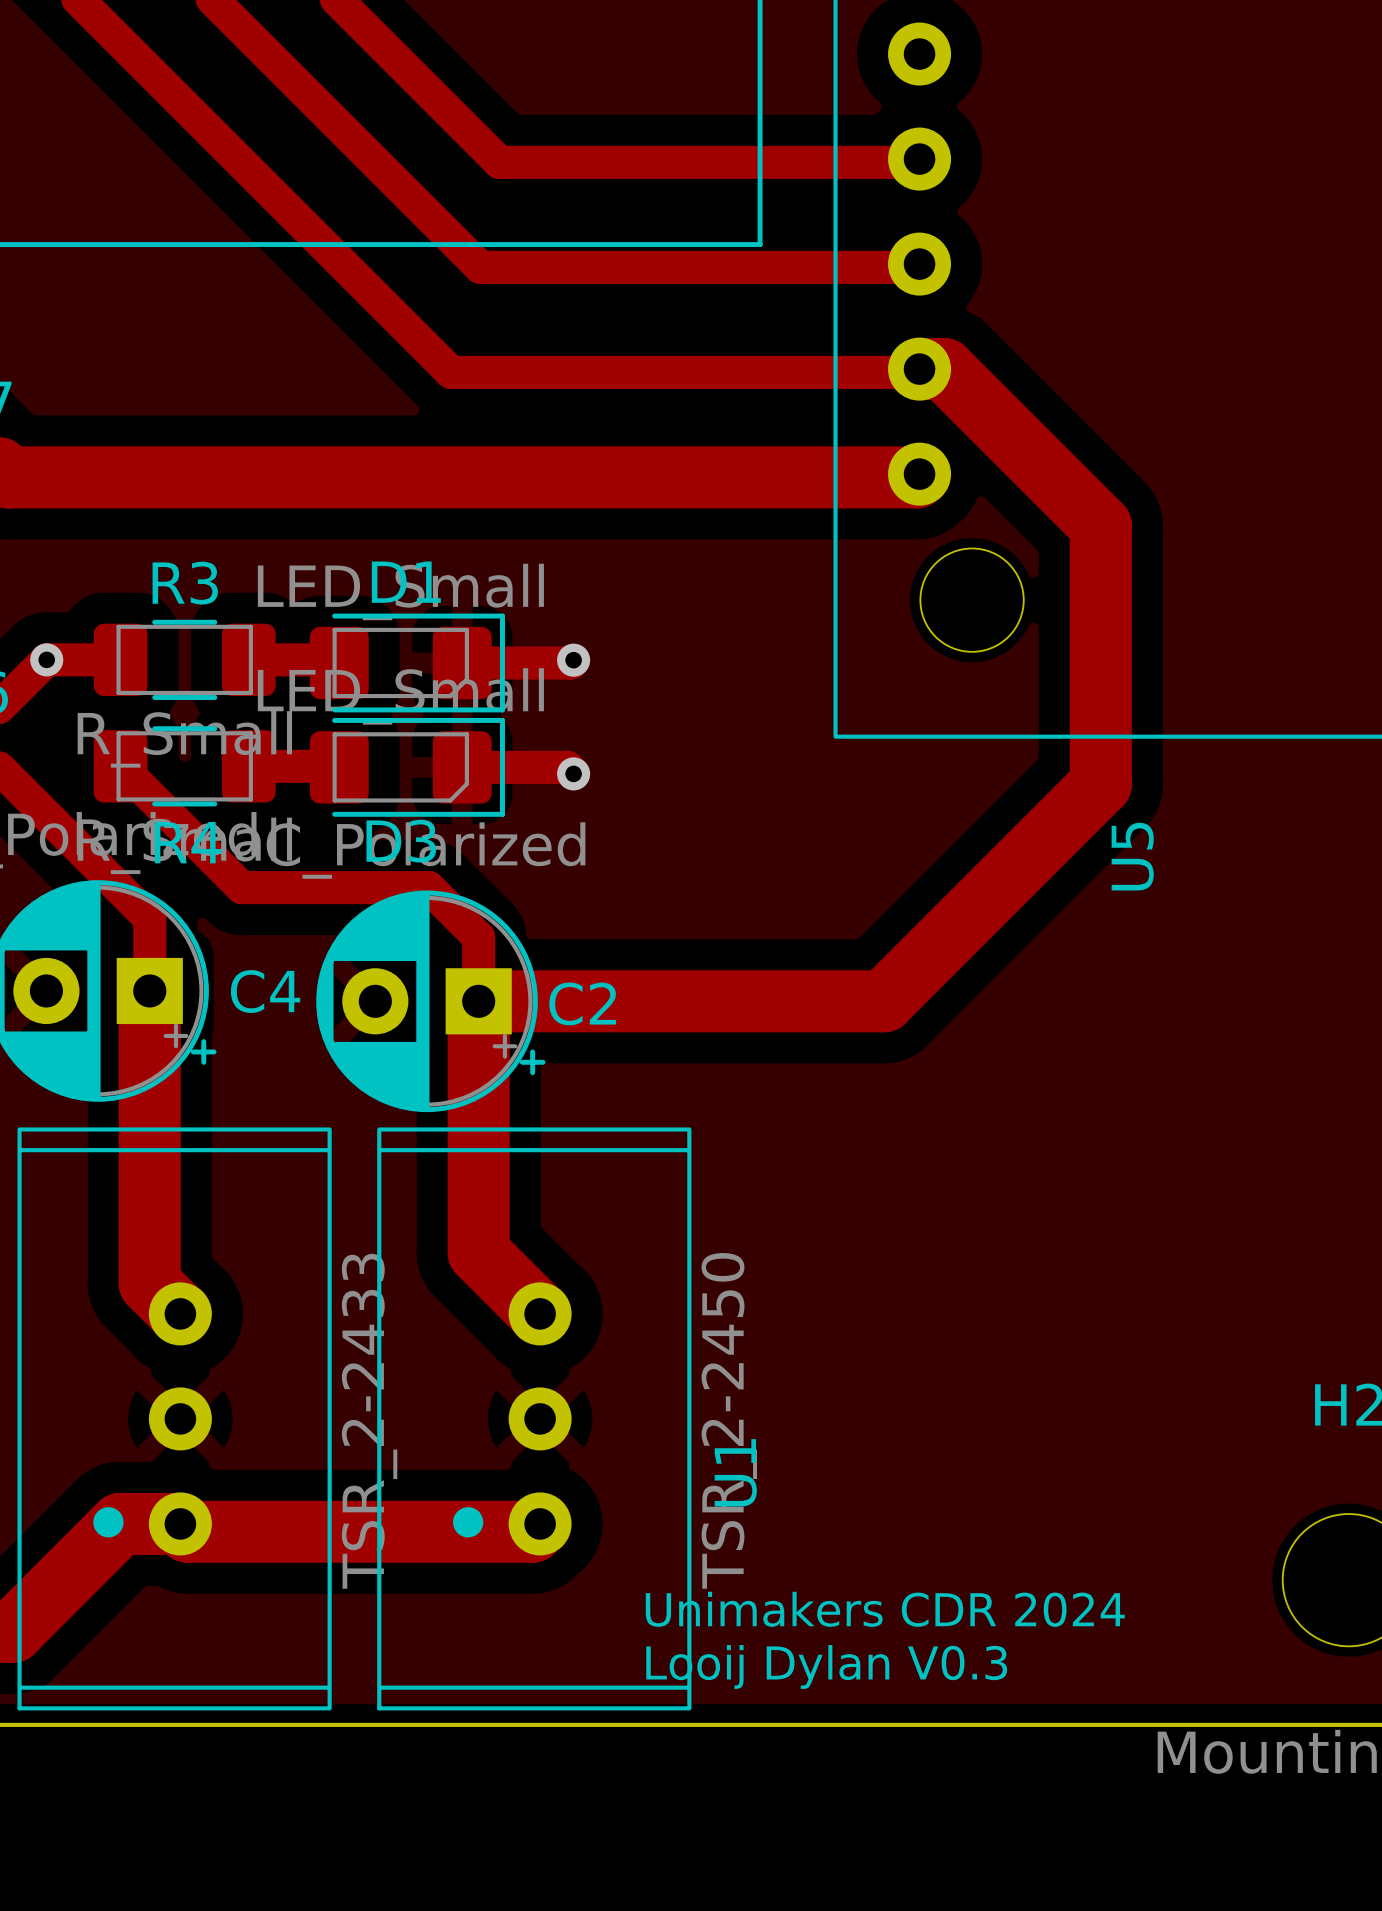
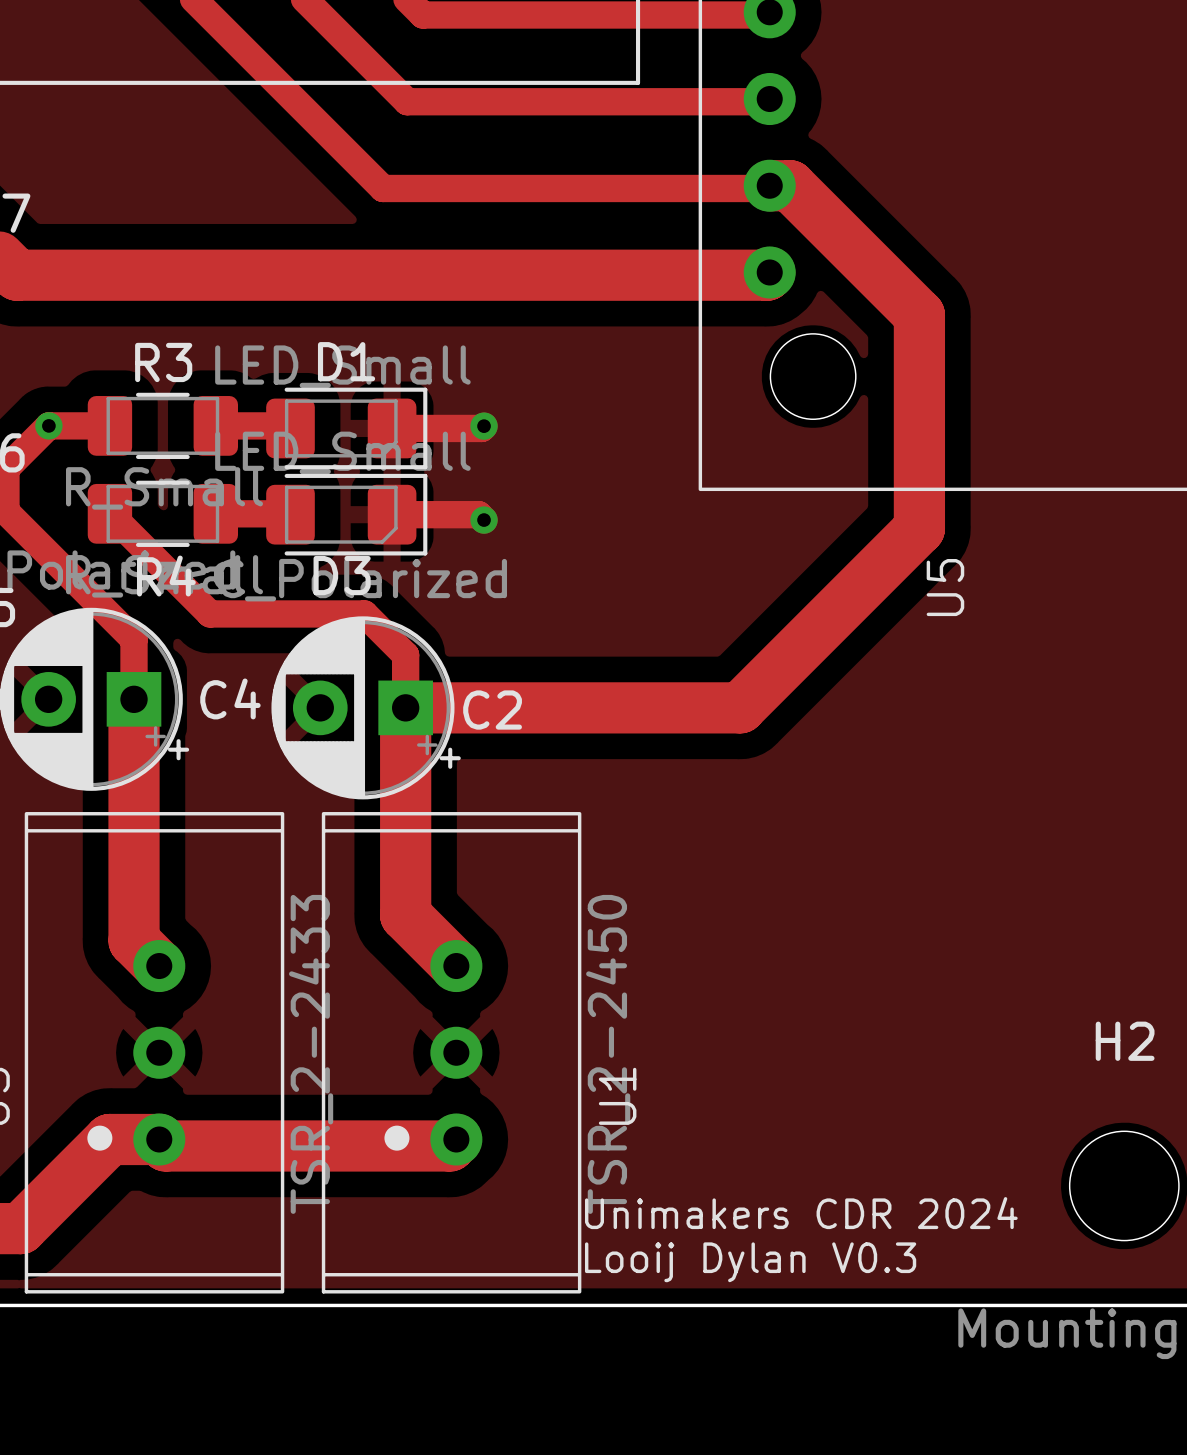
text position: Unimakers CDR 2024 (885, 1609) -> Unimakers CDR 2024 (801, 1213)
text position: Looij Dylan V0.3 (826, 1666) -> Looij Dylan V0.3 (750, 1262)

